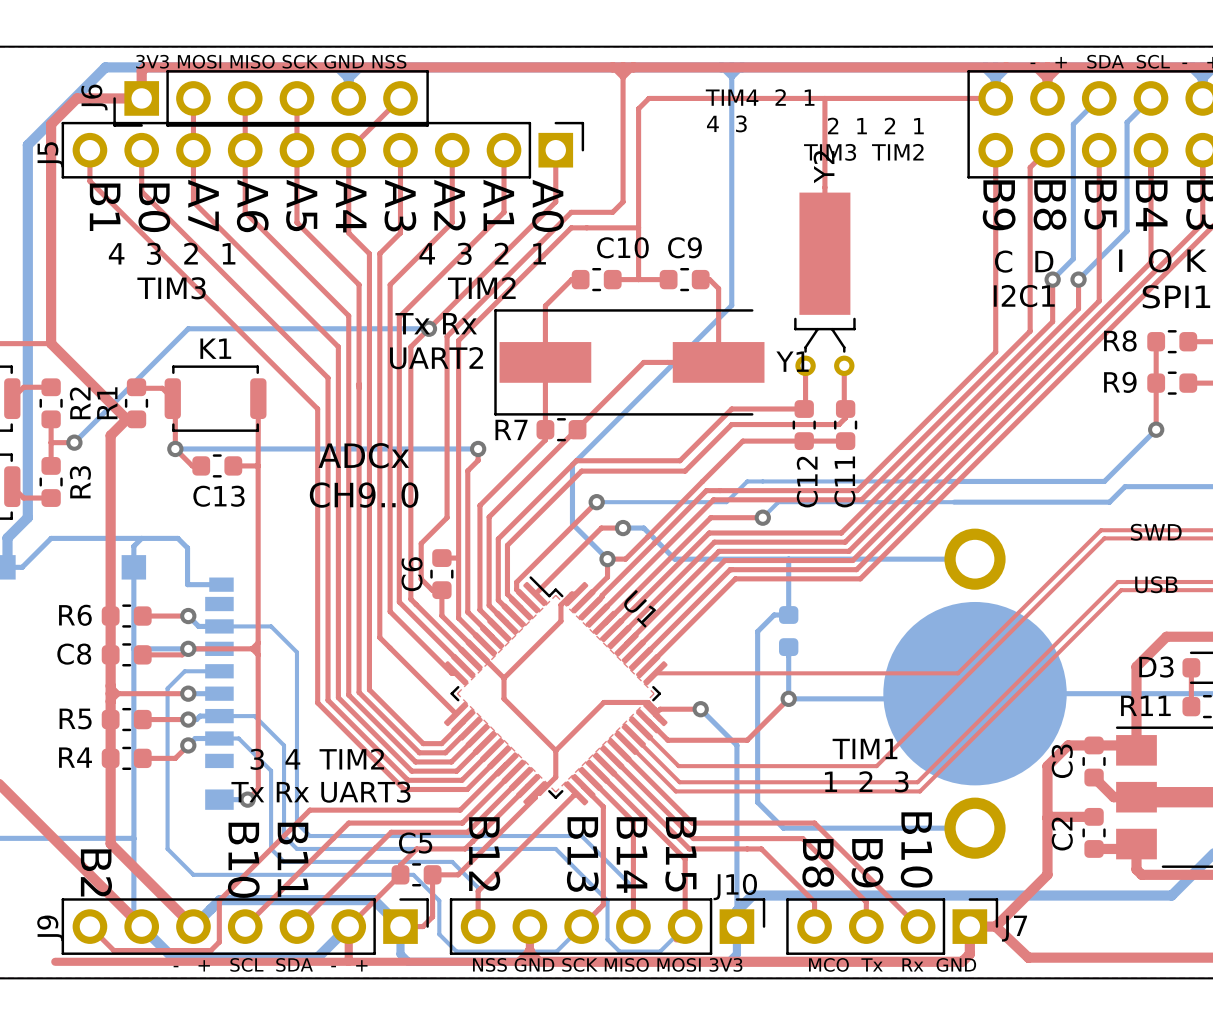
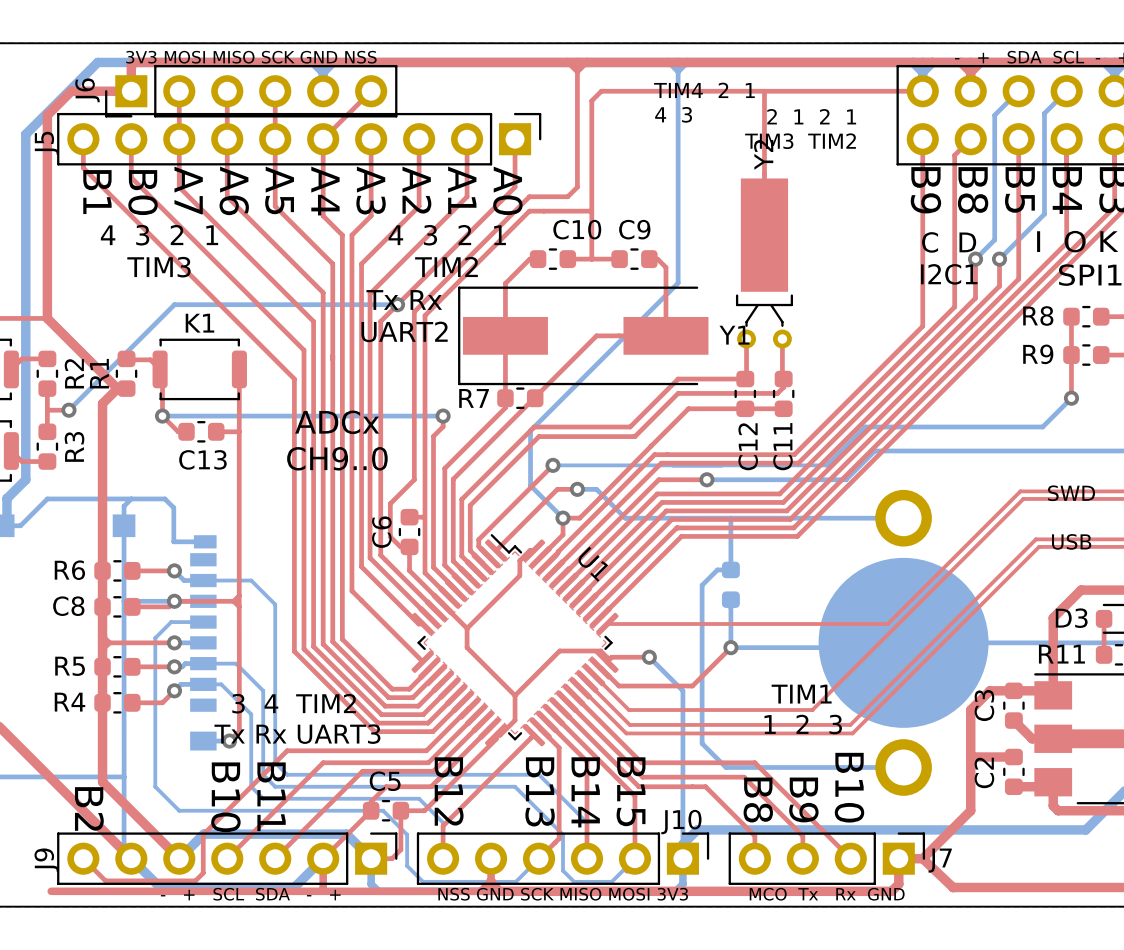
bottom track: (1125, 460) (1104, 481) (747, 481) (726, 502) -> none
bottom track: (1125, 486) (1109, 502) (892, 502) -> (1042, 427) (865, 427) (826, 465)
bottom track: none -> (1042, 450) (874, 450) (846, 479) (706, 479)
bottom track: (778, 502) (762, 517) -> (721, 465) (673, 465)

